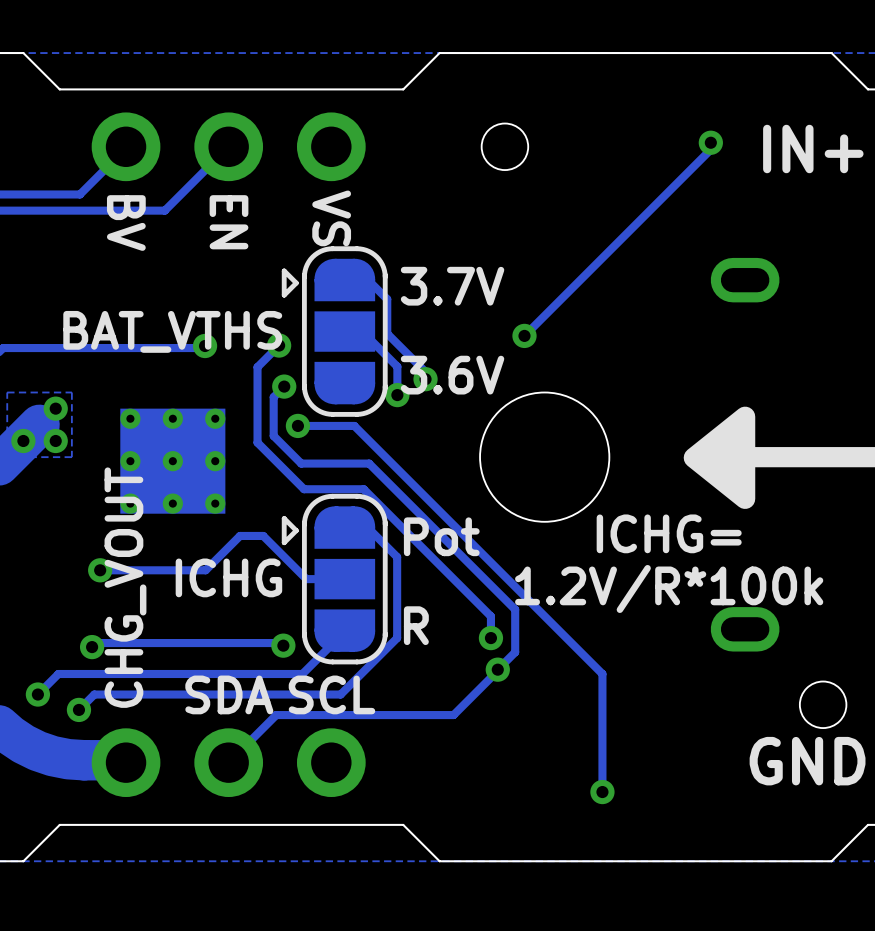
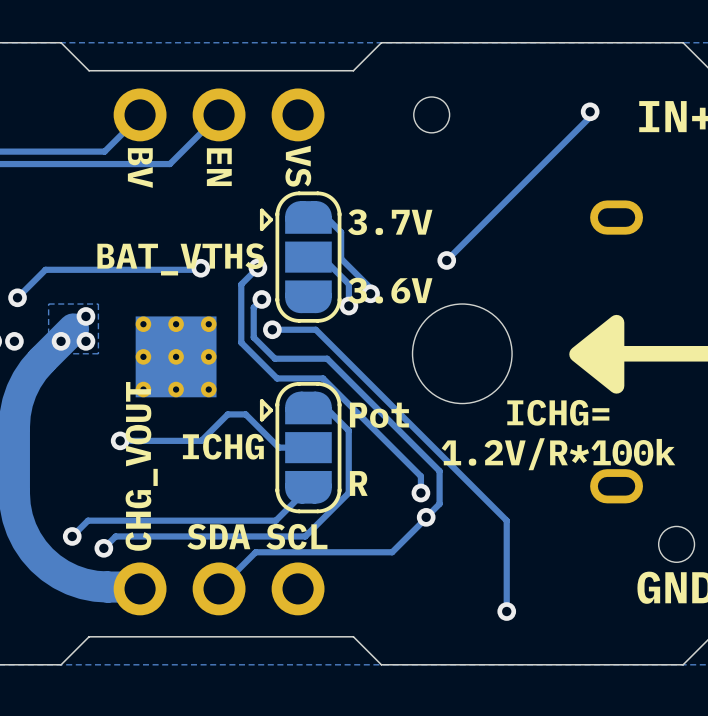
track: (283, 645) (280, 643) (96, 643) (92, 647) -> none
via: (283, 645) -> none
via: (92, 647) -> none

